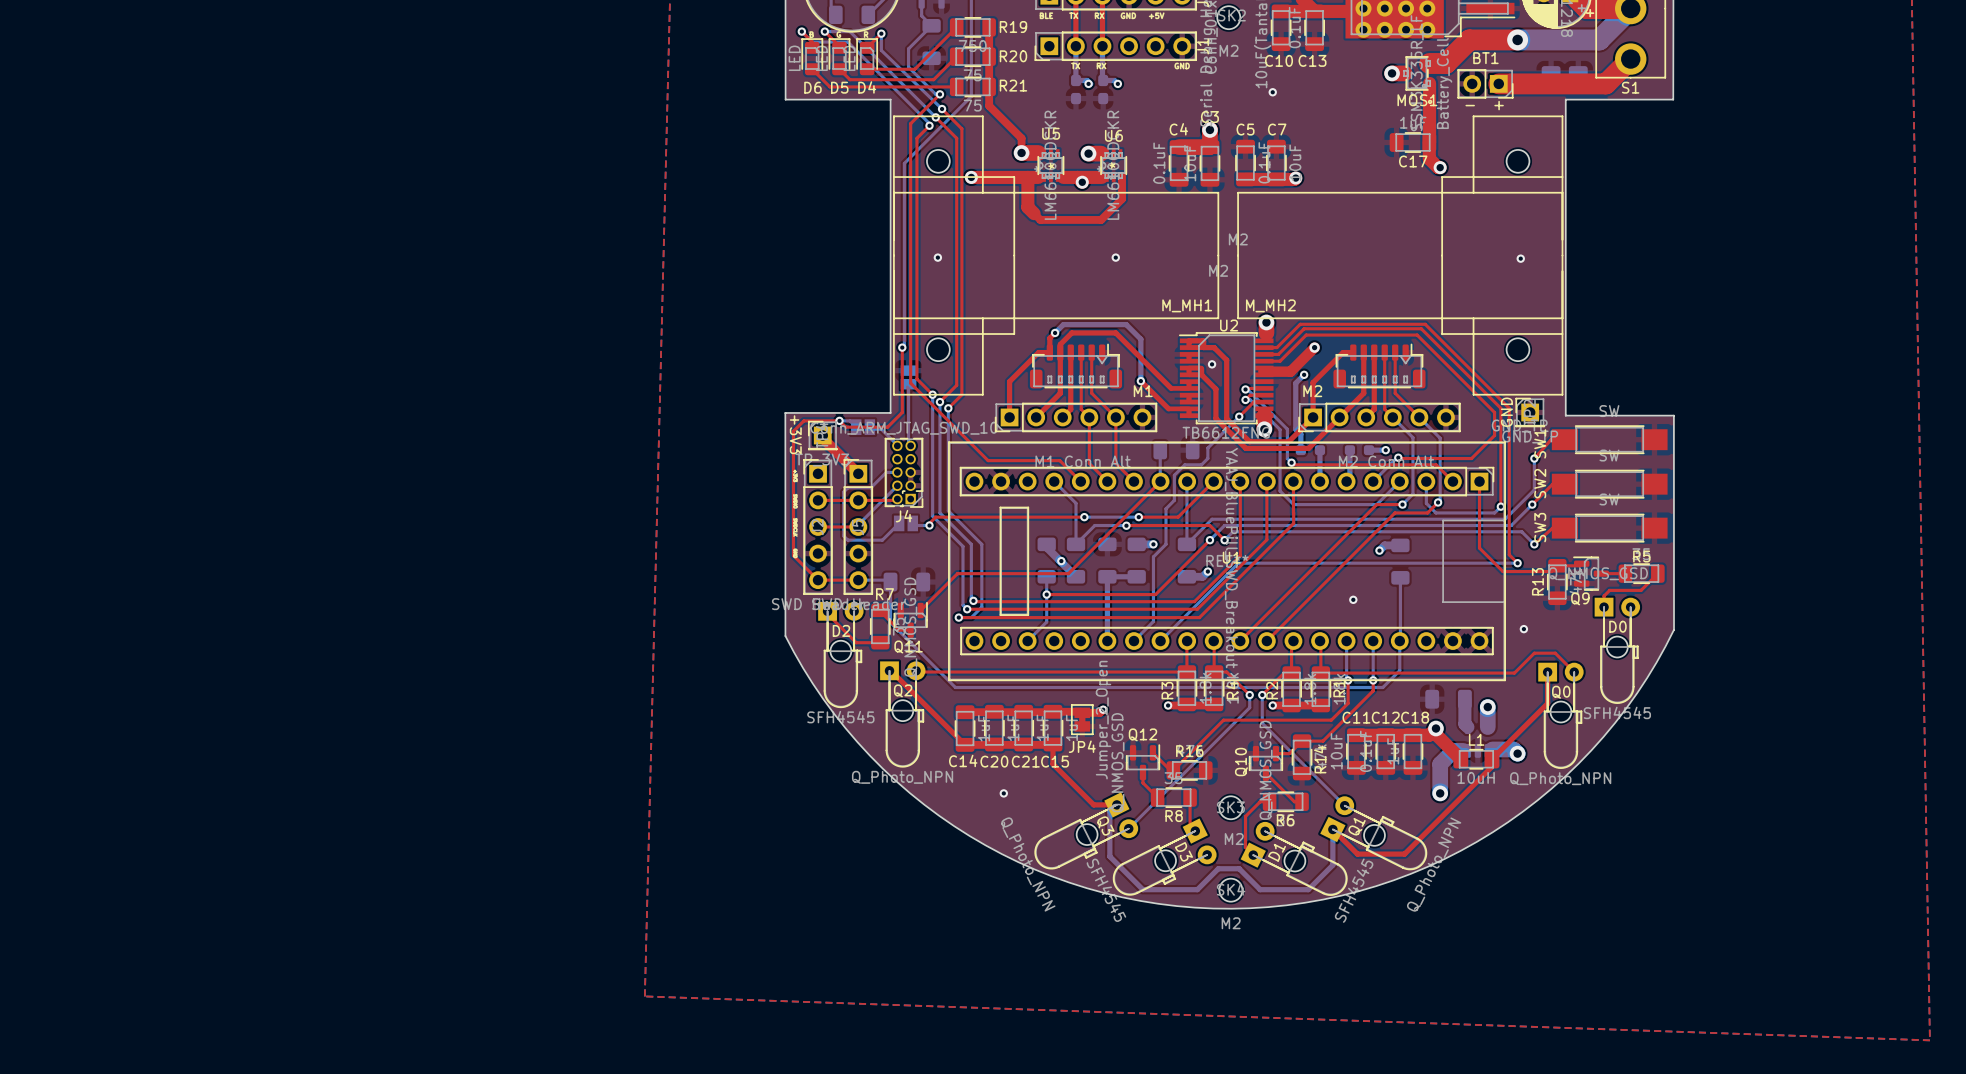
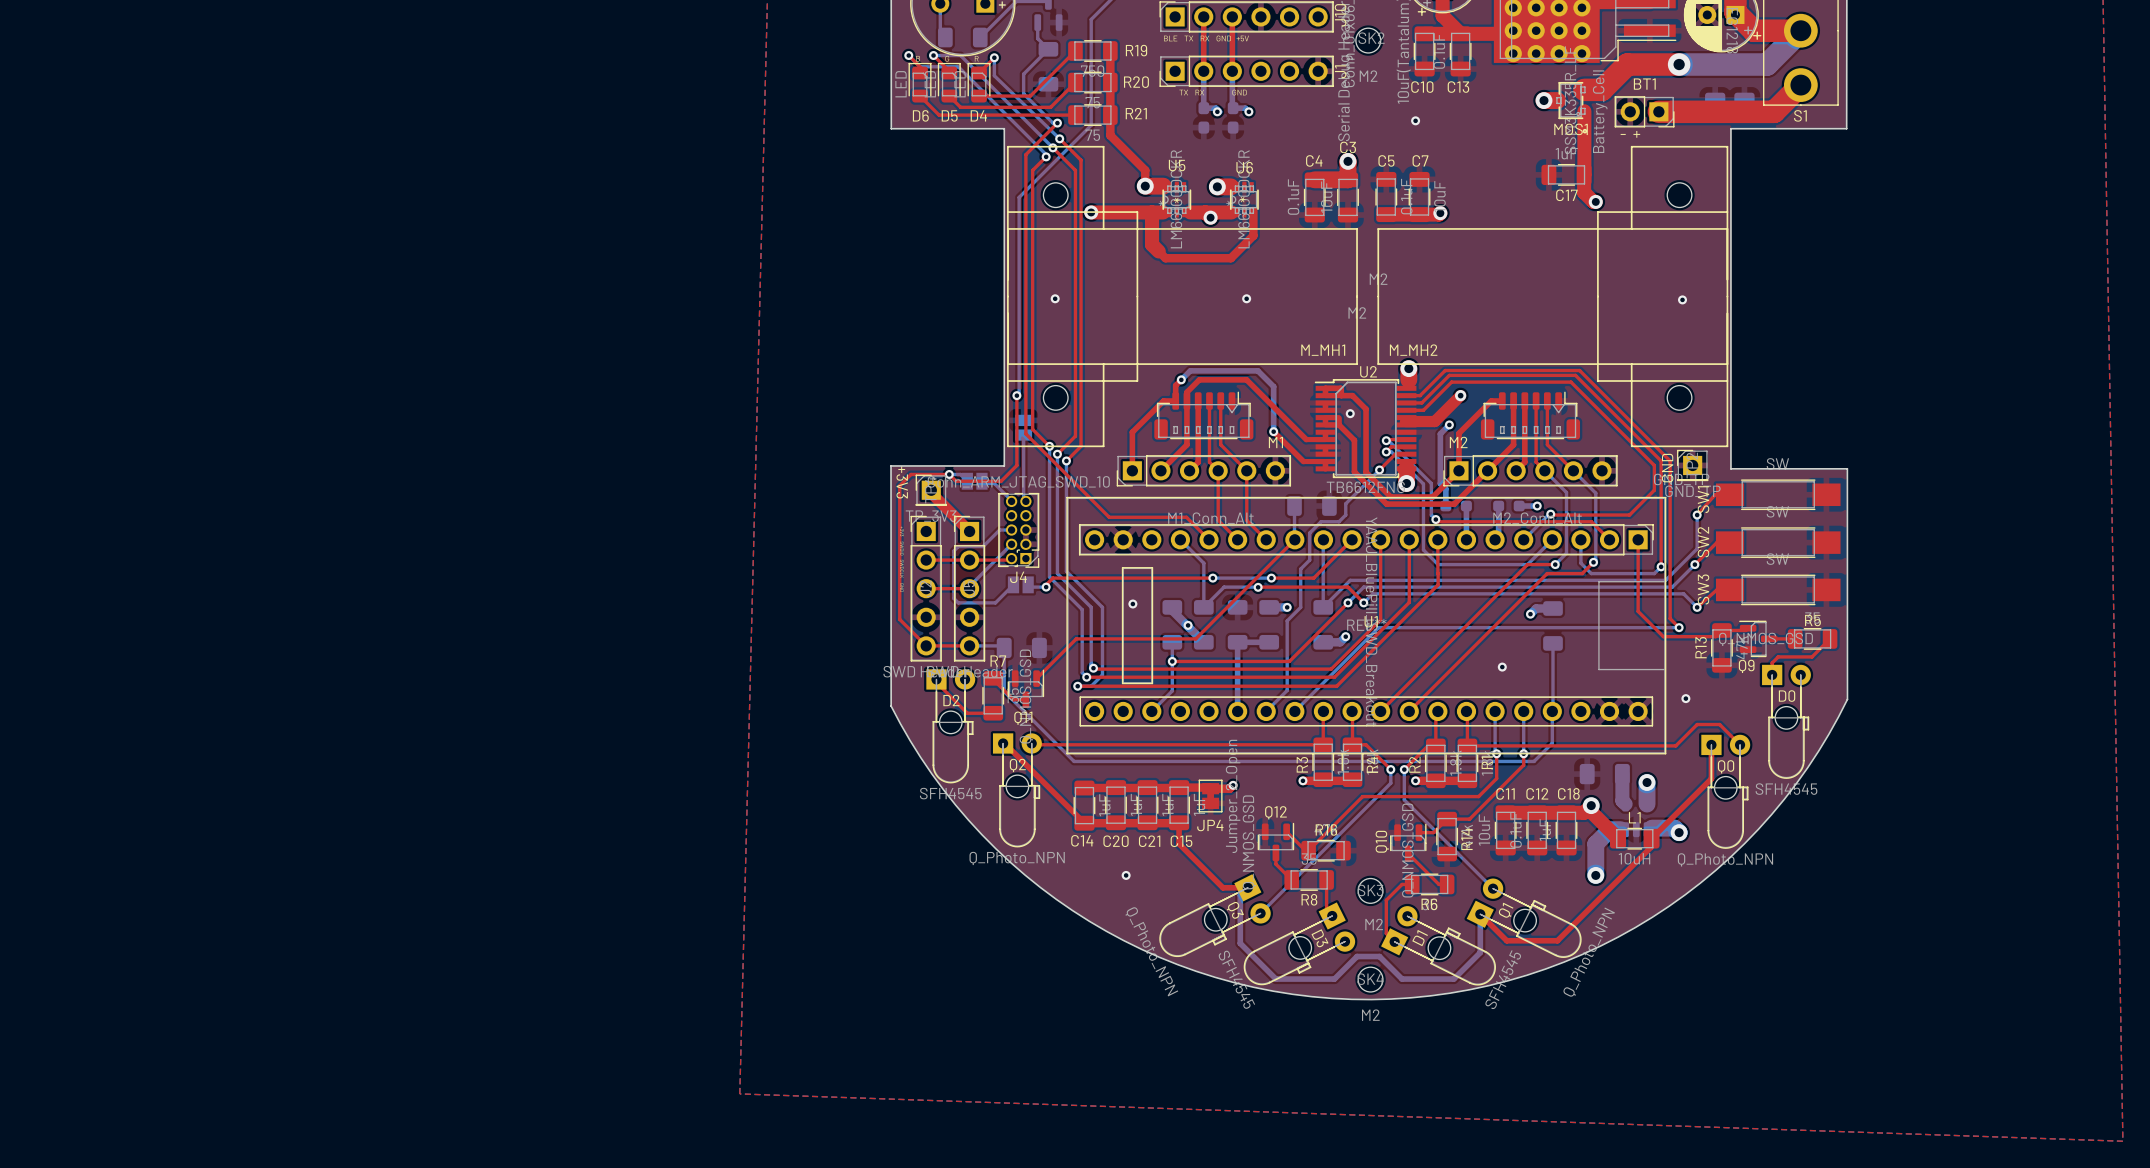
via: none -> (1132, 604)

